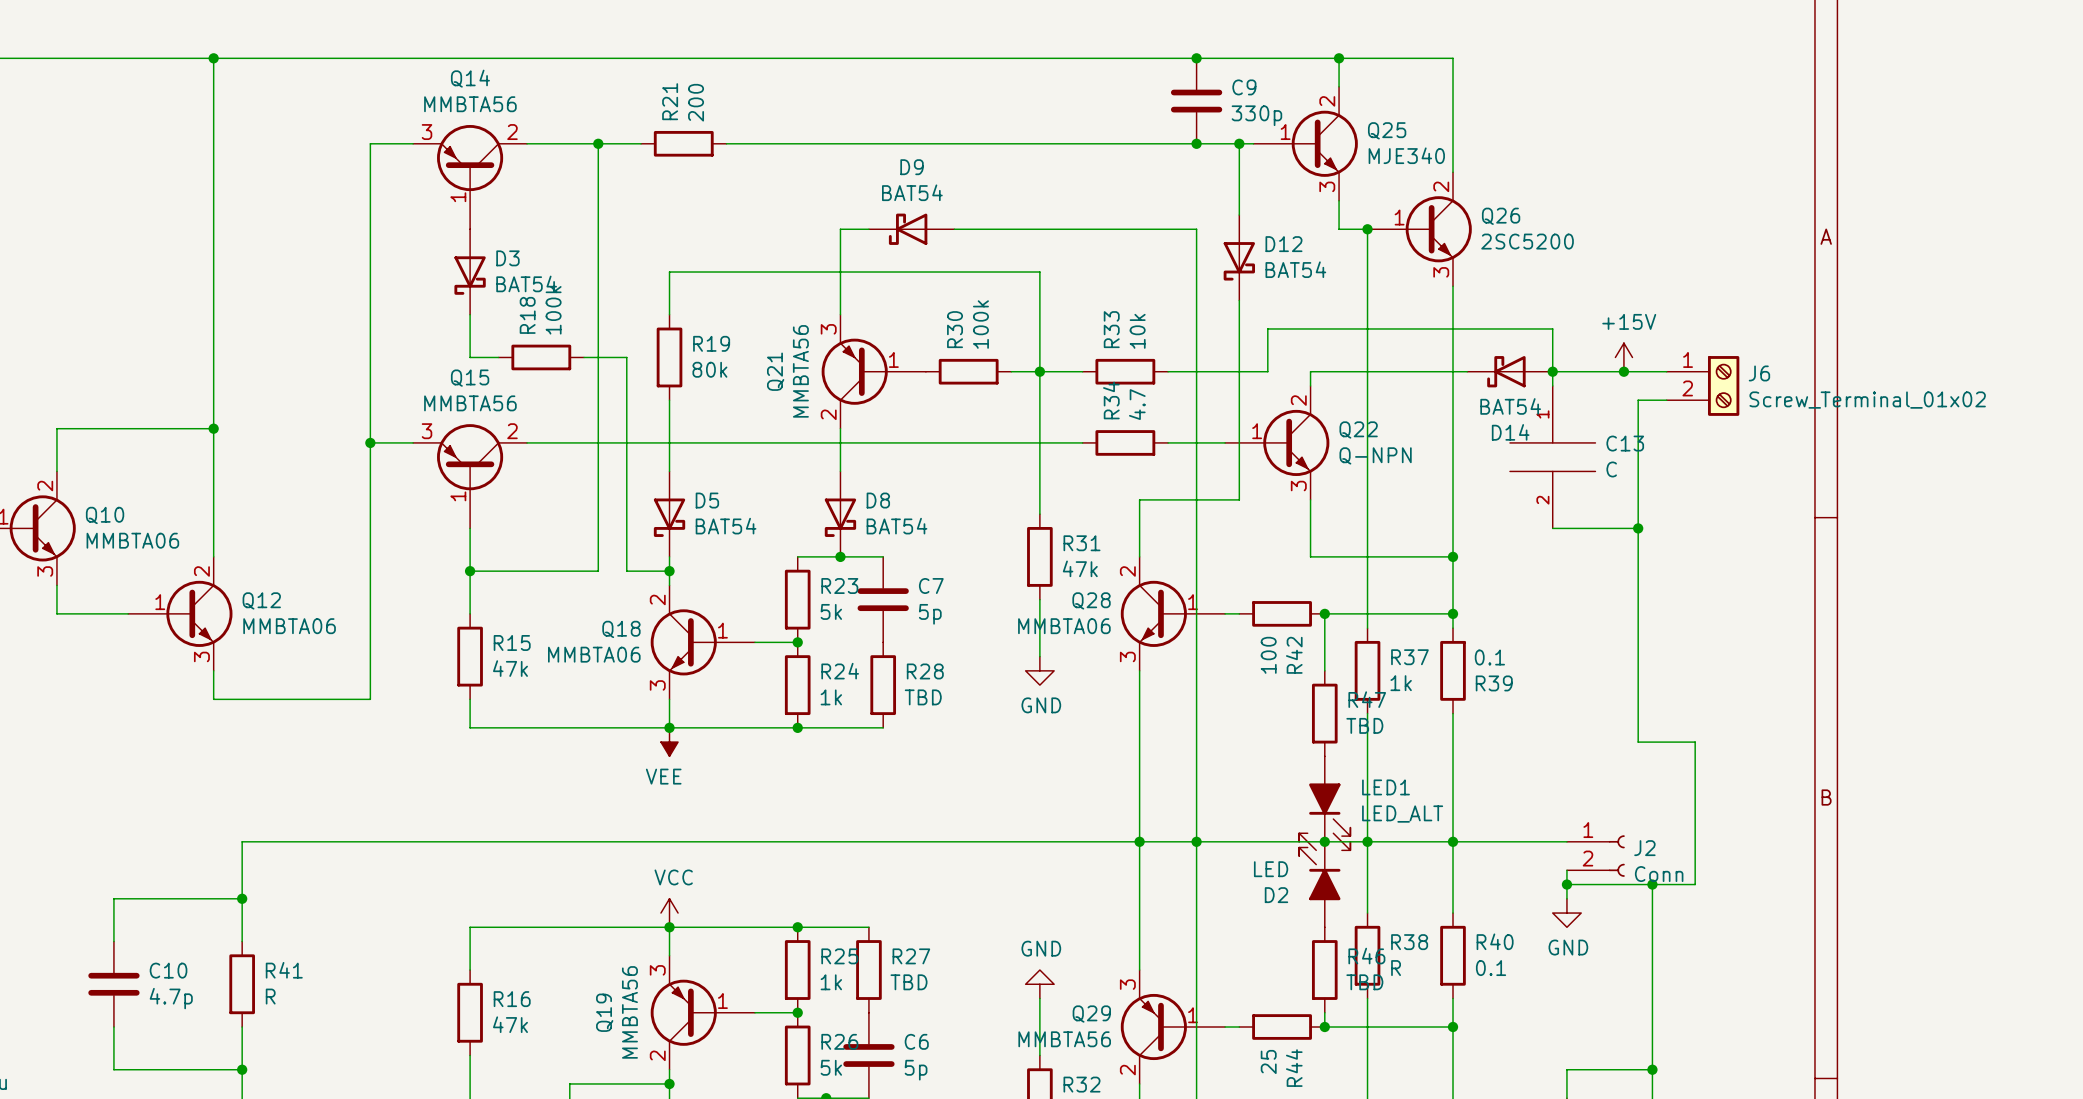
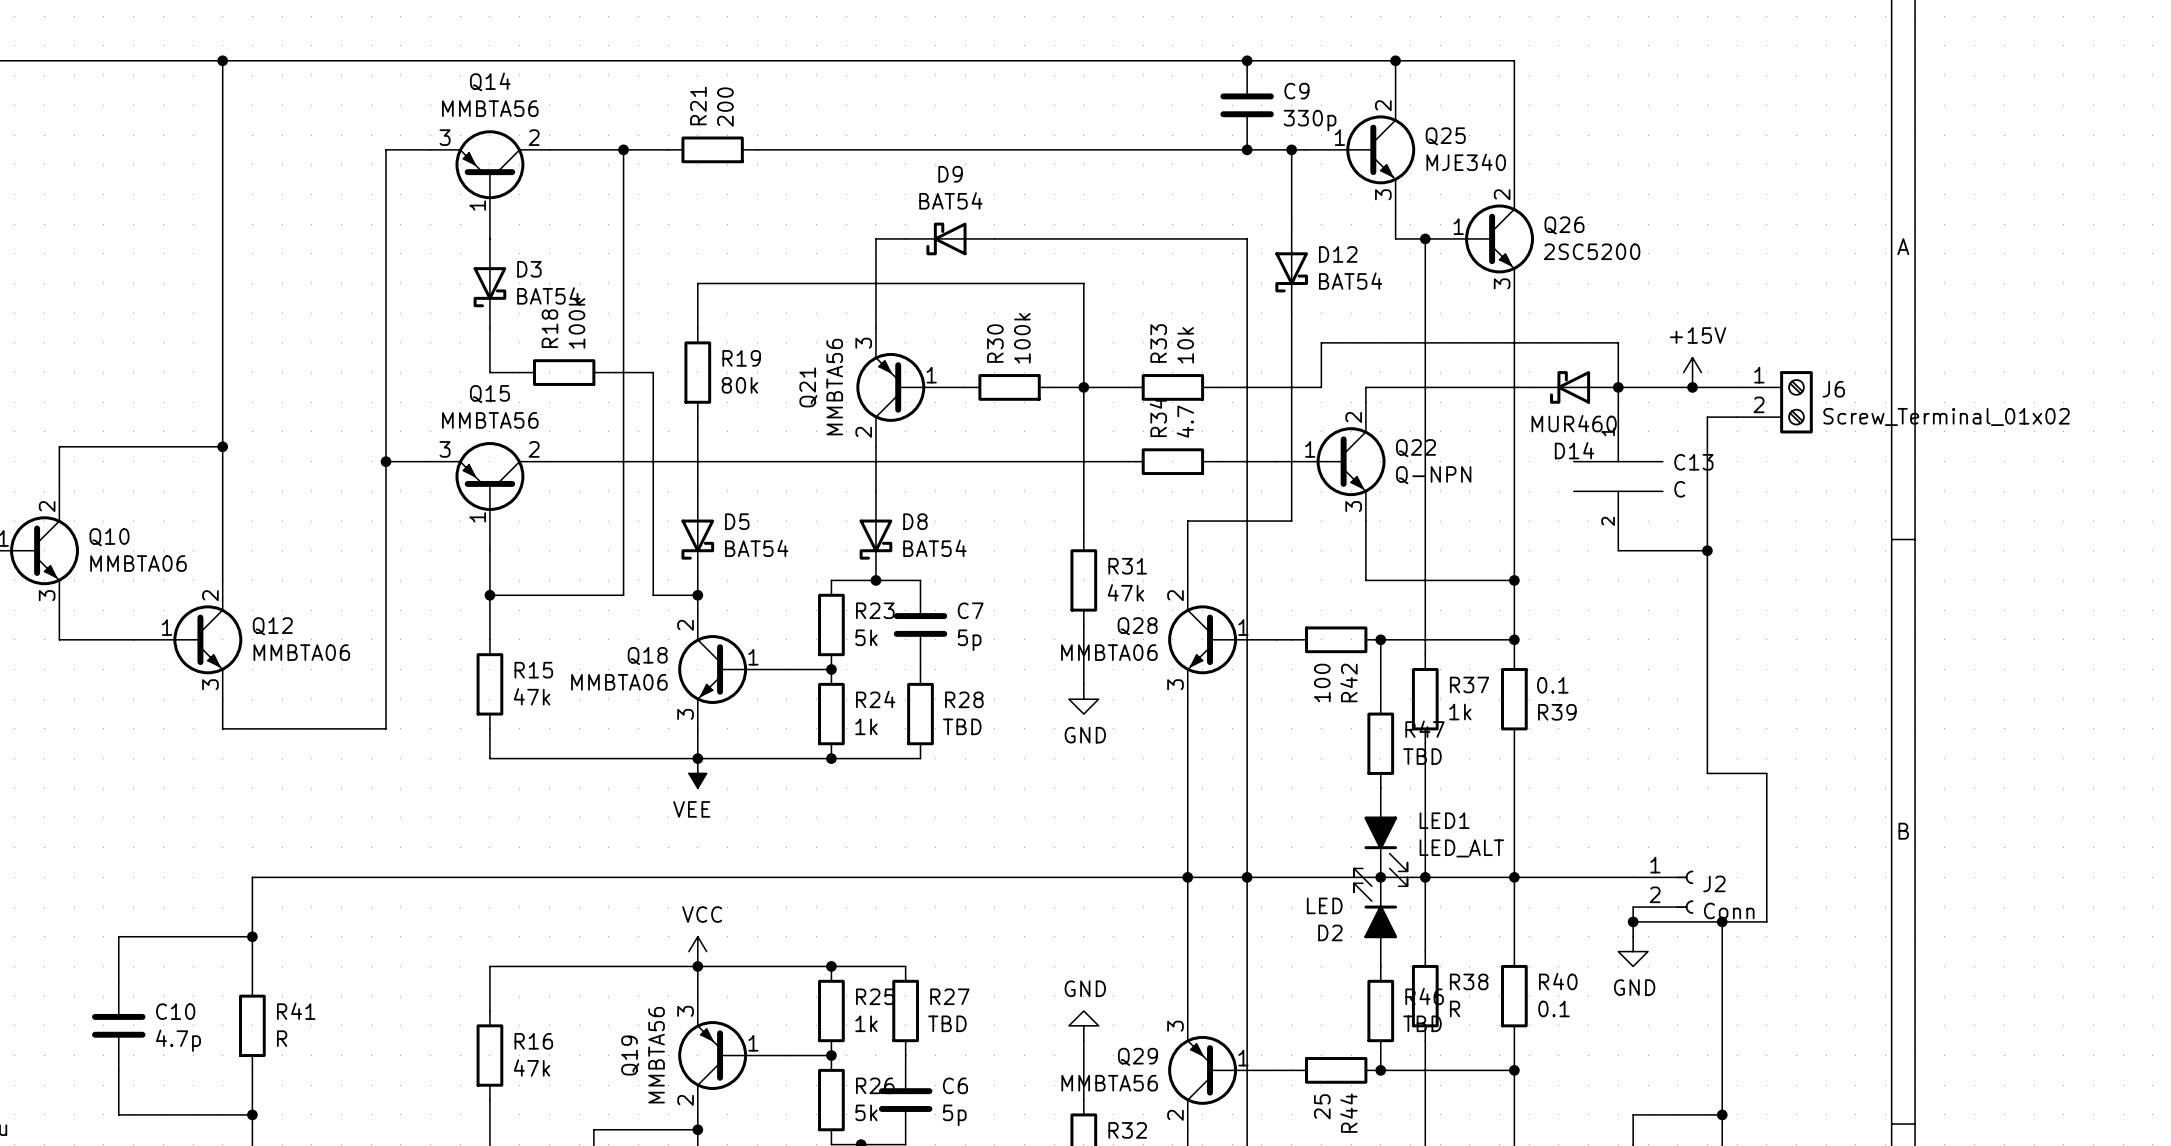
D14 value: BAT54 (1510, 406) -> MUR460 (1574, 423)

